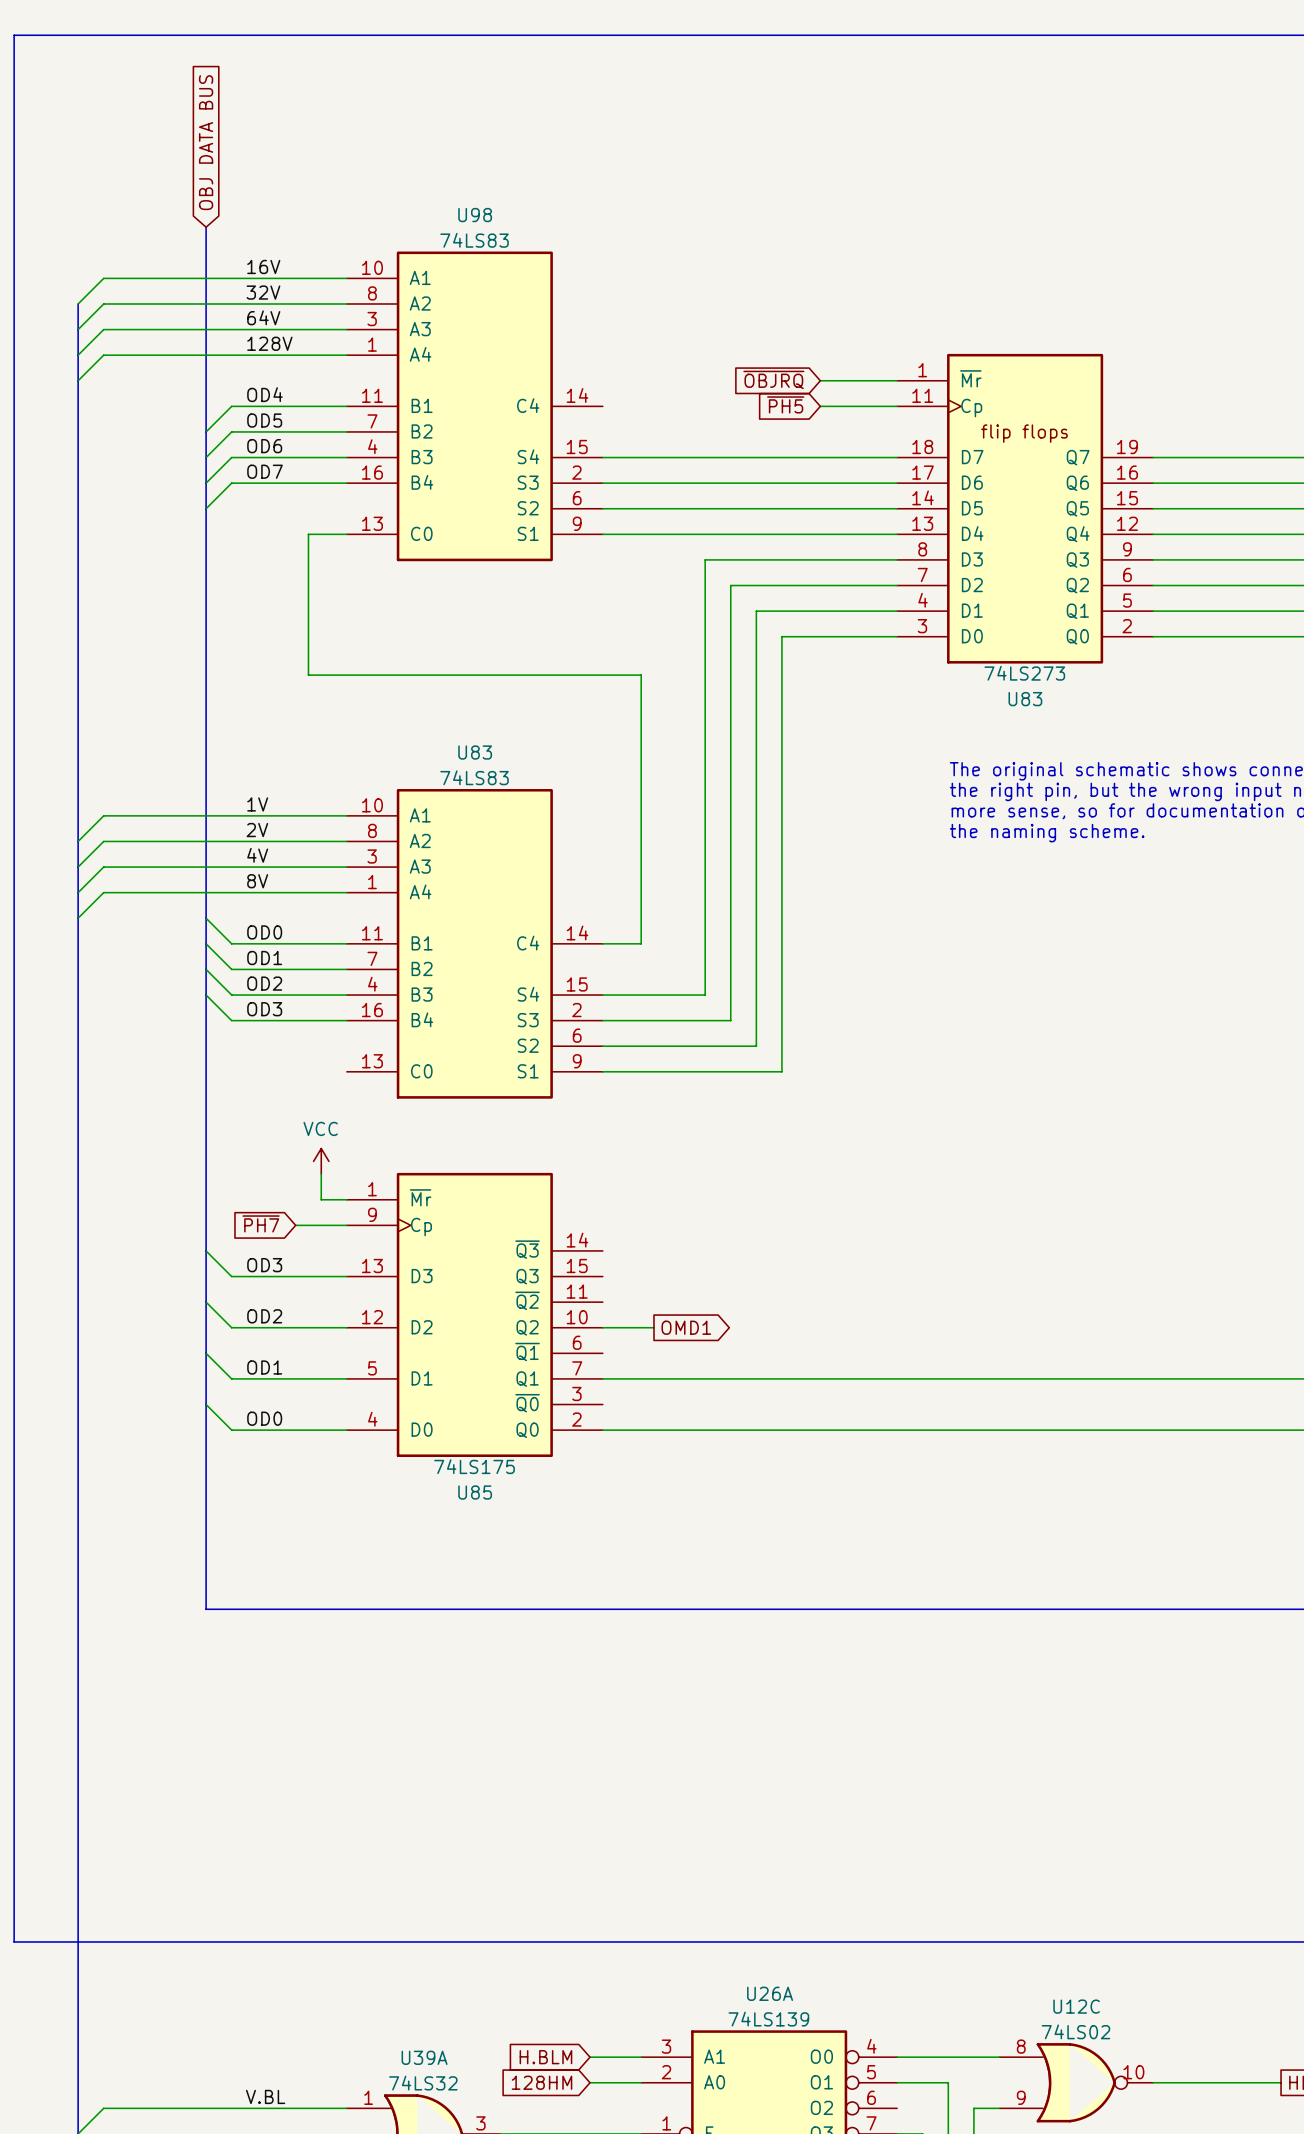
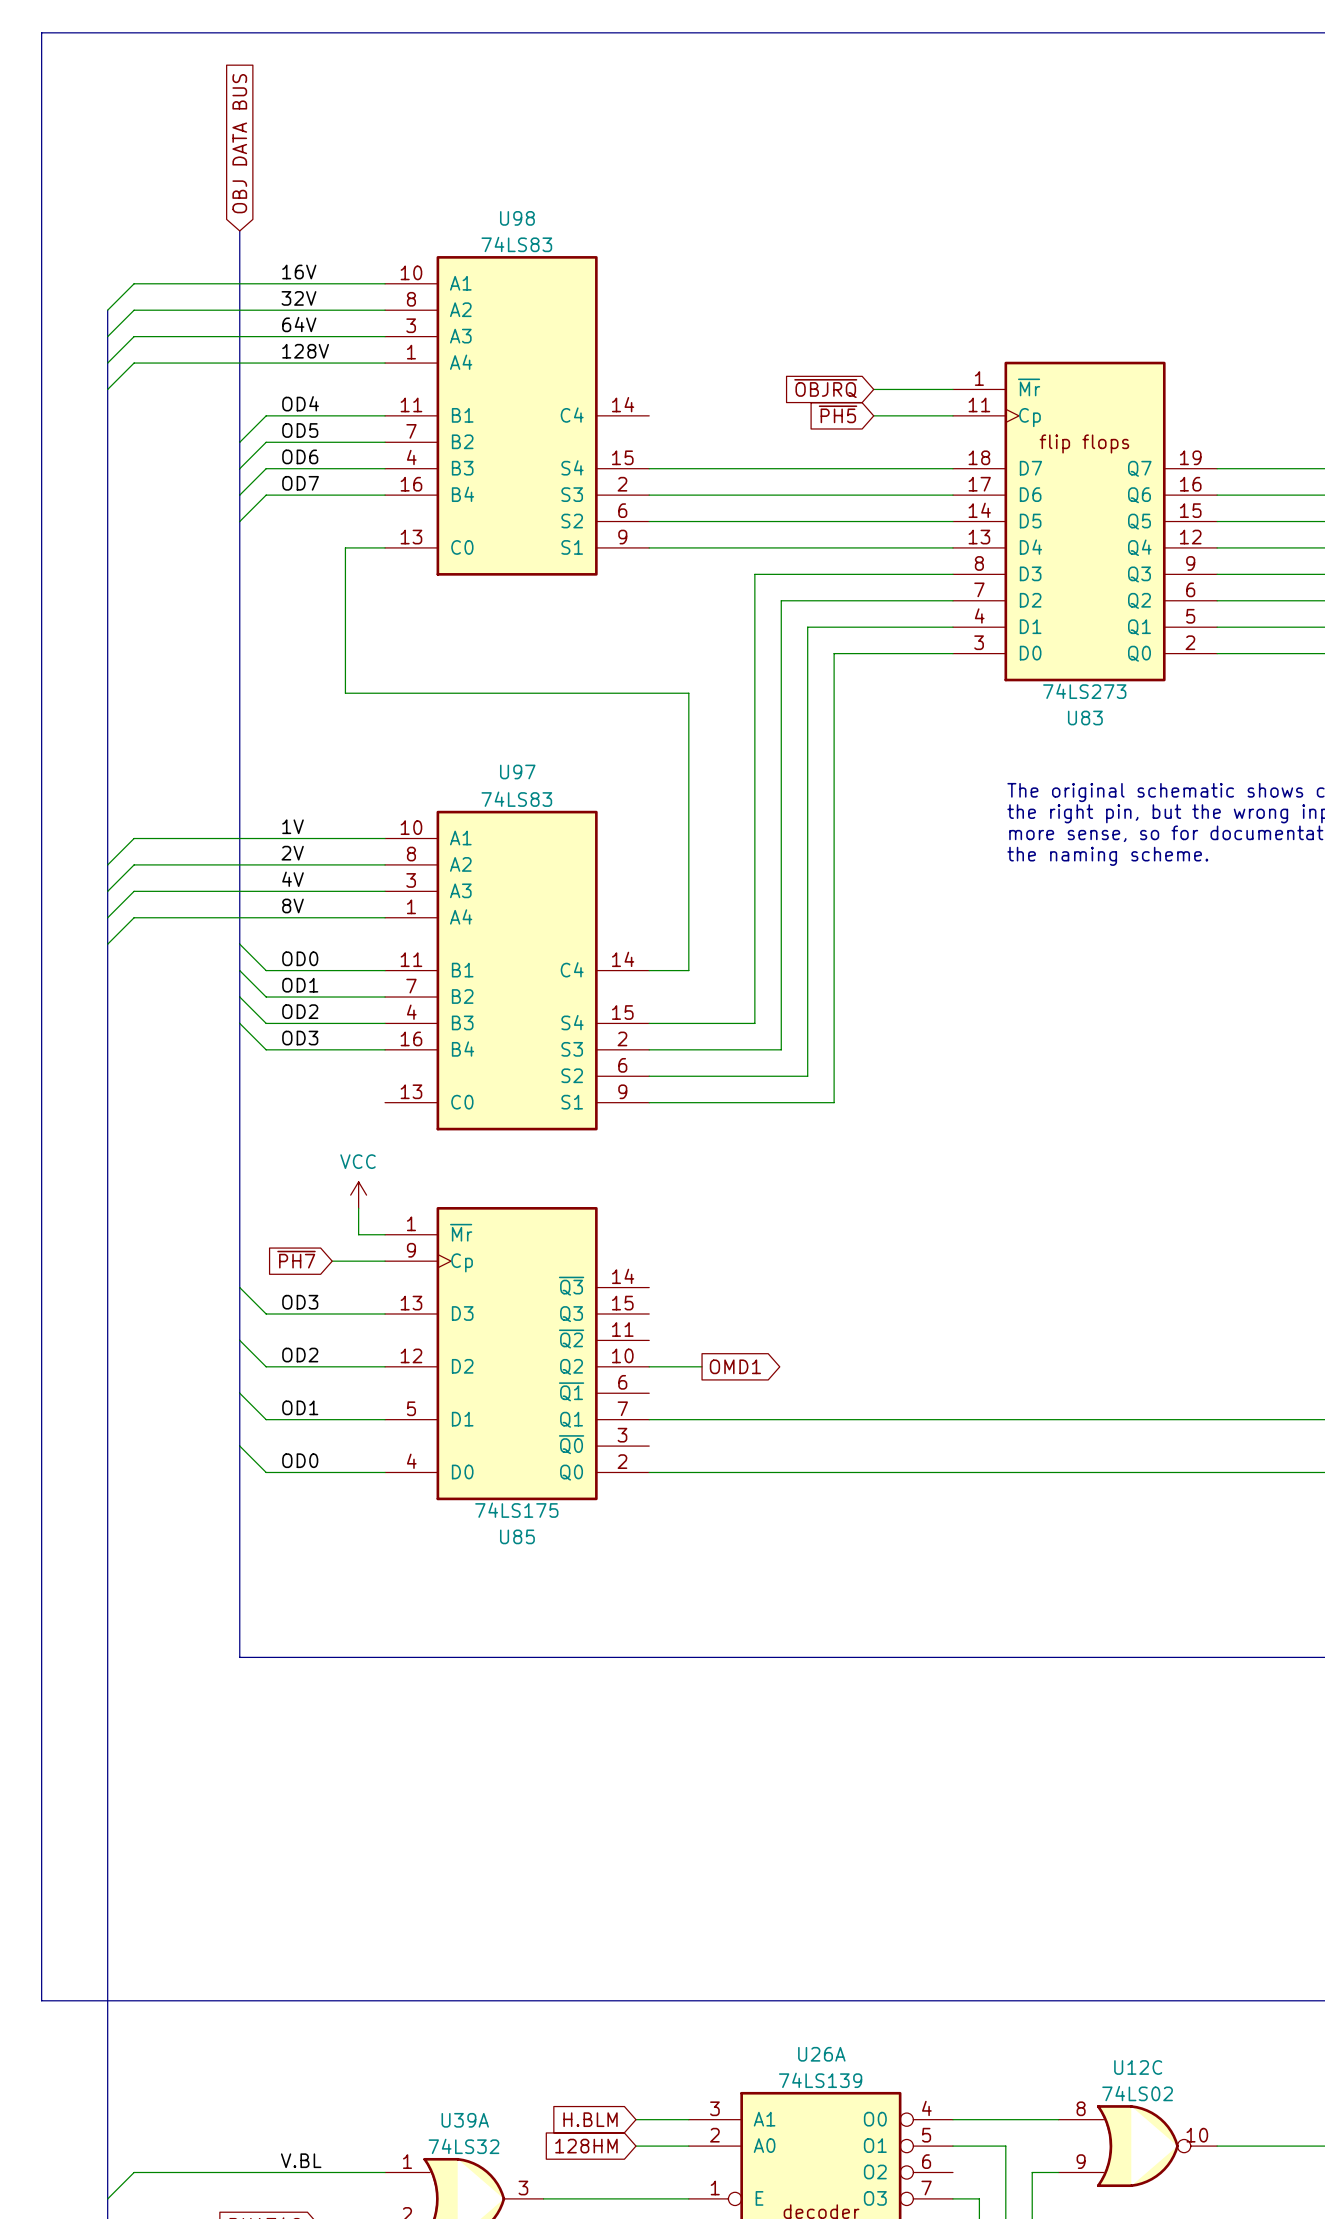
U83 name: U83 (475, 752) -> U97 (517, 771)

